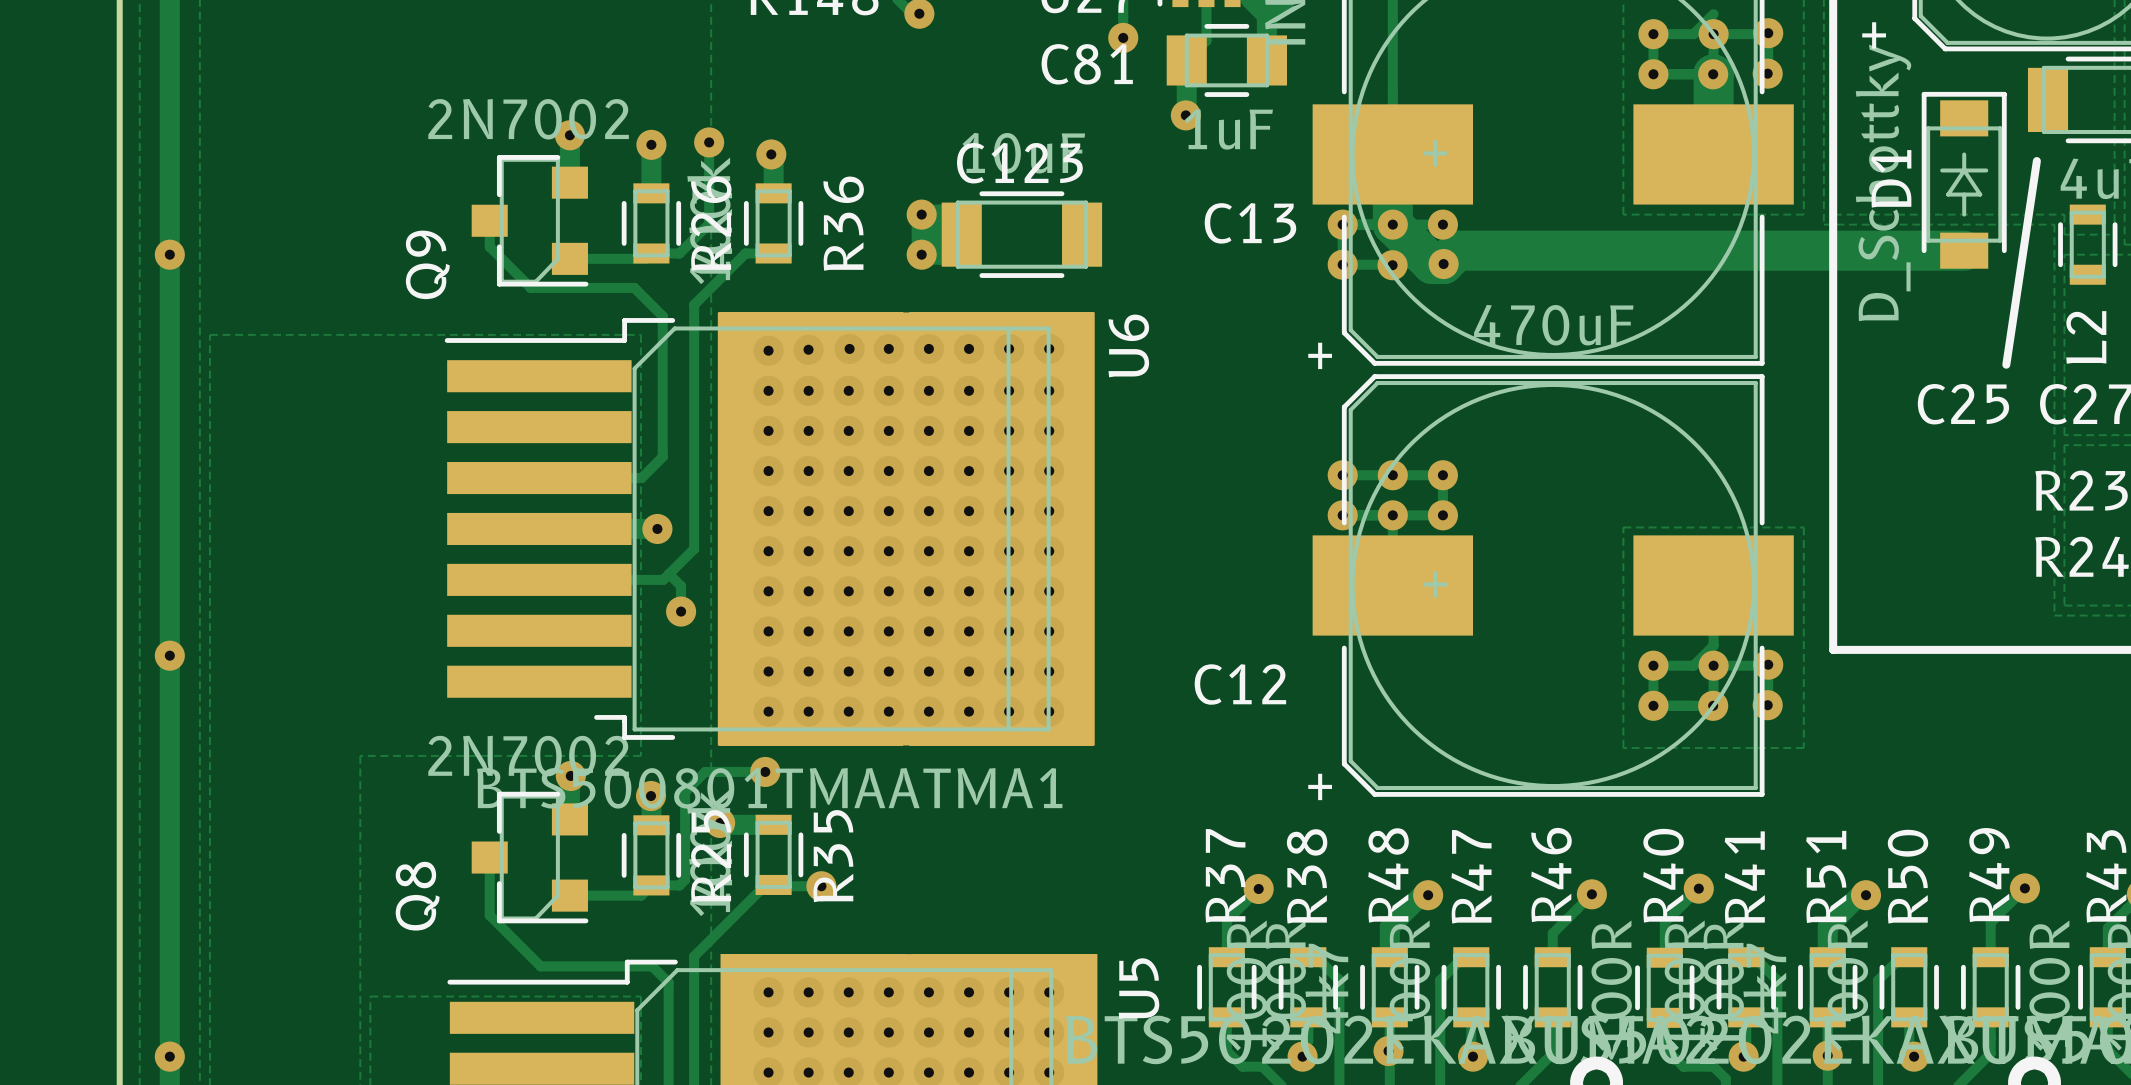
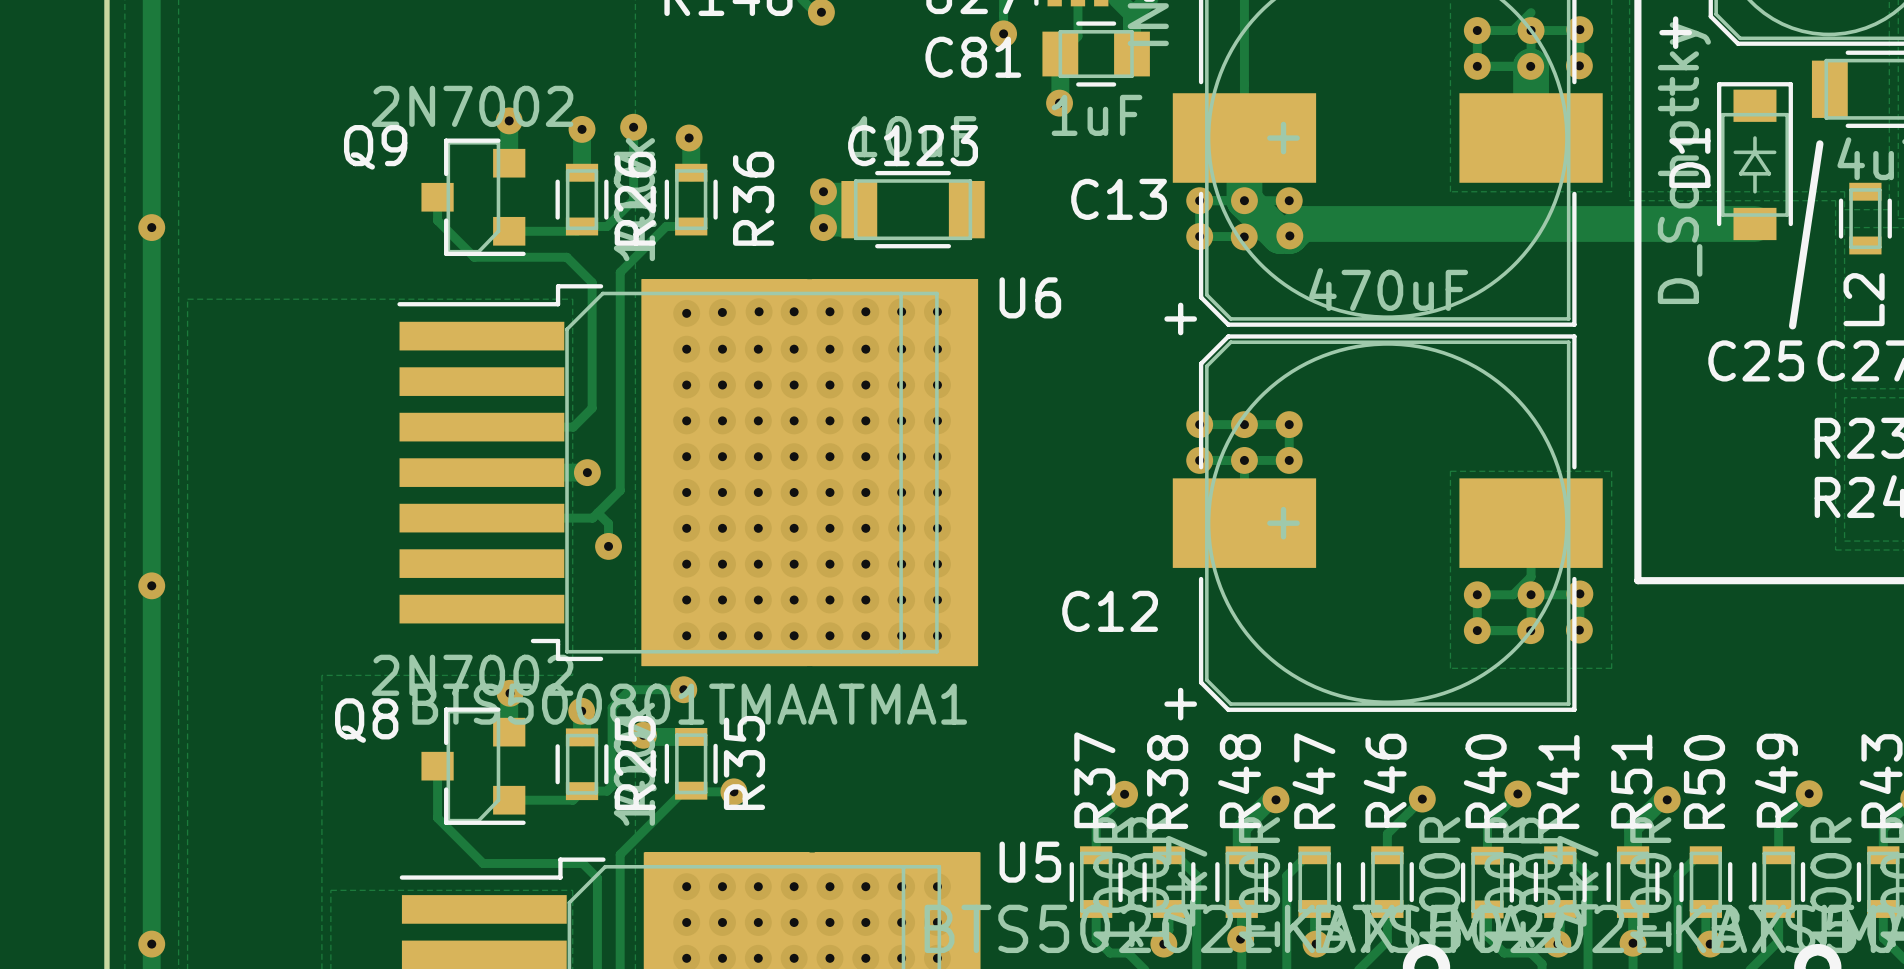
Q9 name rotation: 0° (427, 264) -> 90° clockwise (375, 147)
U6 name rotation: 0° (1128, 345) -> 90° clockwise (1030, 297)
Q8 name rotation: 0° (417, 896) -> 90° clockwise (366, 720)
U5 name rotation: 0° (1139, 988) -> 90° clockwise (1030, 862)

